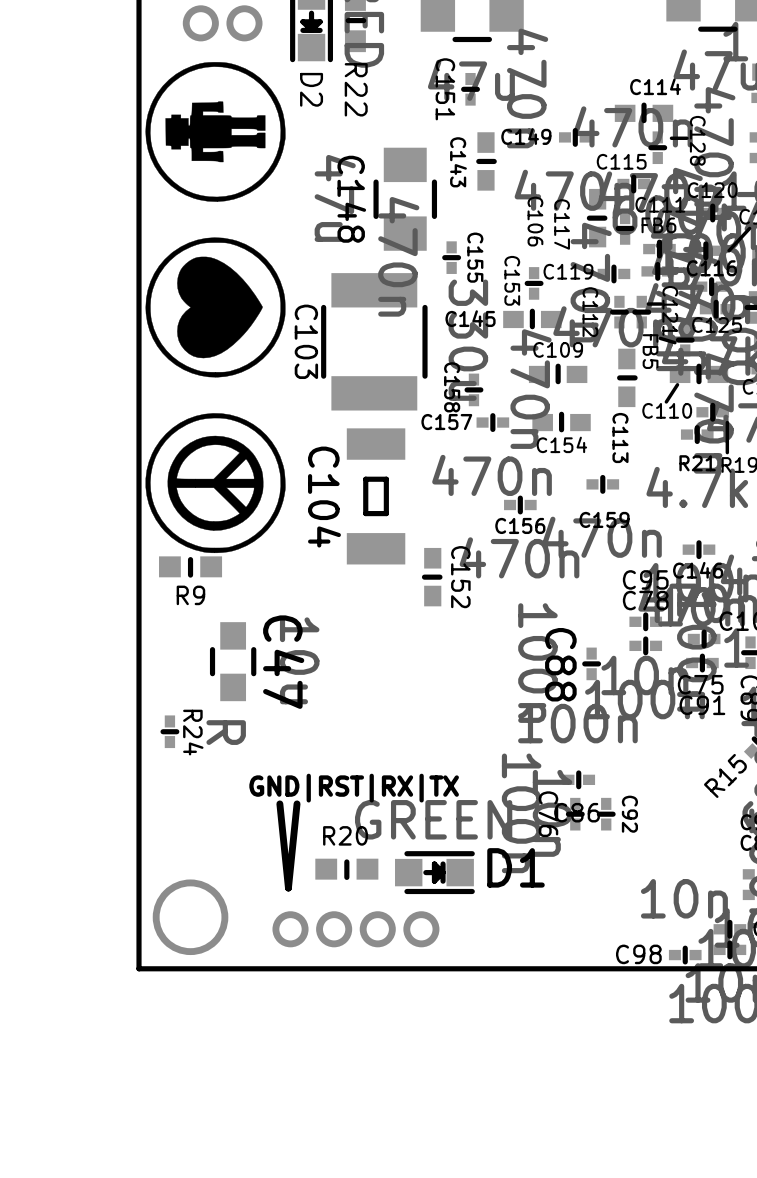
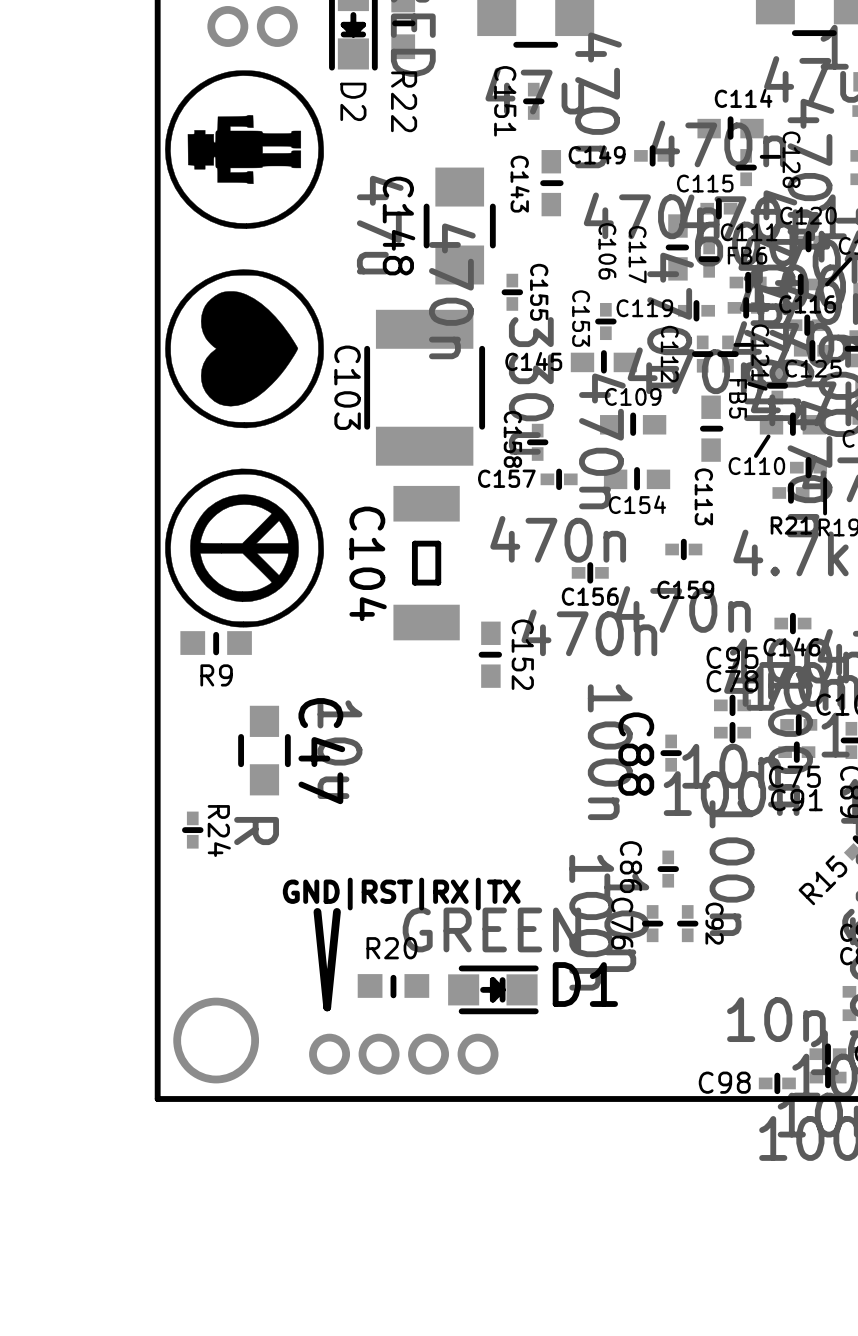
C86 rotation: 0° (578, 779) -> 90° clockwise (668, 869)

